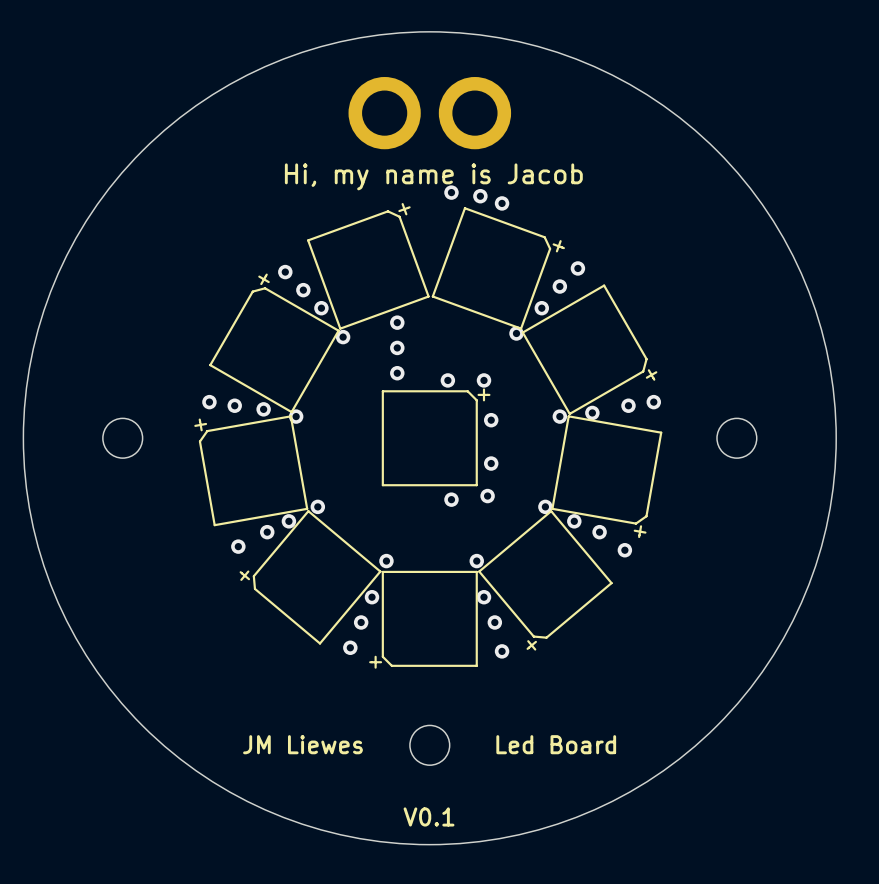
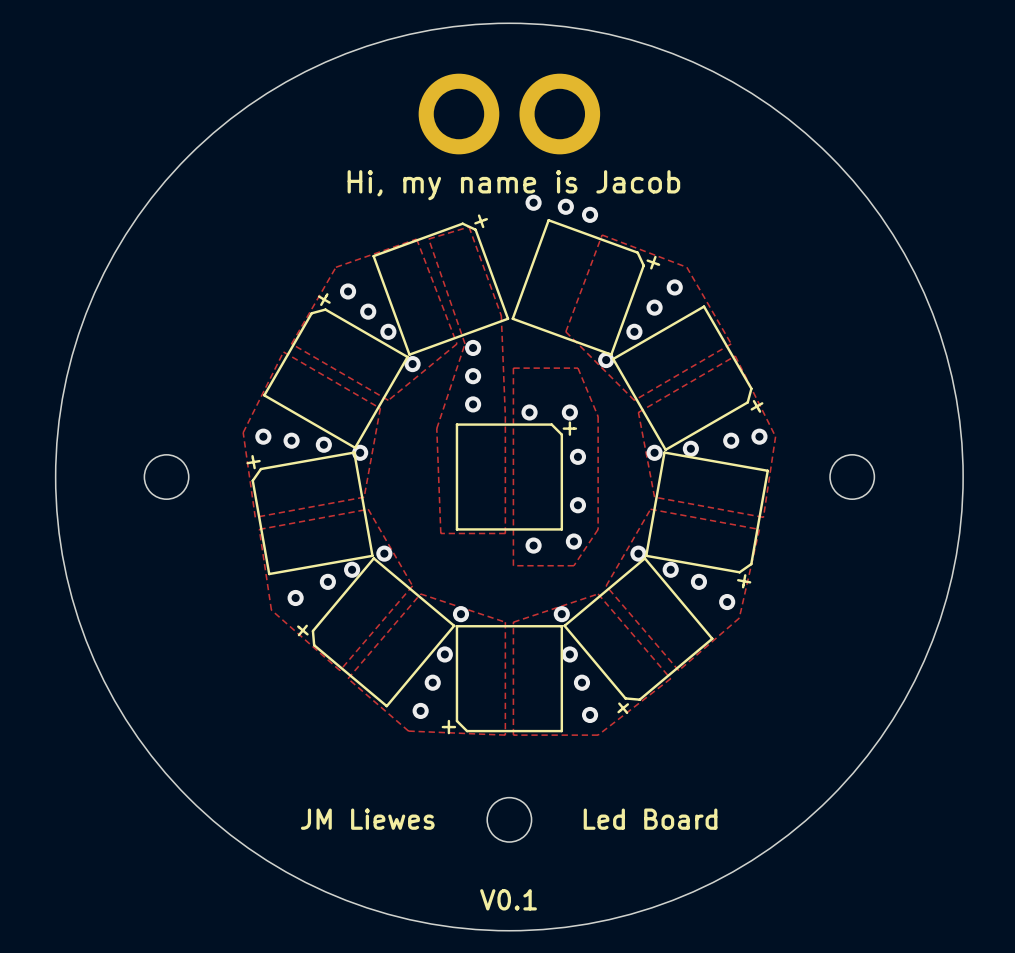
zone outline: none -> (469, 226) (428, 239) (465, 343) (436, 428) (440, 533) (505, 533) (505, 416) (501, 315) (469, 226)
zone outline: none -> (602, 235) (565, 331) (634, 400) (731, 343) (686, 267) (602, 235)
zone outline: none -> (416, 239) (335, 267) (291, 343) (388, 400) (456, 343) (416, 239)
zone outline: none -> (283, 351) (243, 432) (255, 517) (364, 497) (380, 408) (283, 351)
zone outline: none -> (735, 356) (638, 412) (654, 497) (763, 517) (775, 436) (735, 356)
zone outline: none -> (513, 368) (513, 565) (573, 565) (598, 529) (598, 416) (577, 368) (513, 368)
zone outline: none -> (368, 509) (259, 529) (271, 610) (339, 670) (412, 585) (368, 509)
zone outline: none -> (650, 509) (606, 585) (678, 670) (739, 618) (759, 529) (650, 509)
zone outline: none -> (420, 593) (348, 678) (408, 731) (505, 735) (505, 622) (420, 593)
zone outline: none -> (598, 593) (513, 622) (513, 735) (598, 735) (670, 678) (598, 593)

